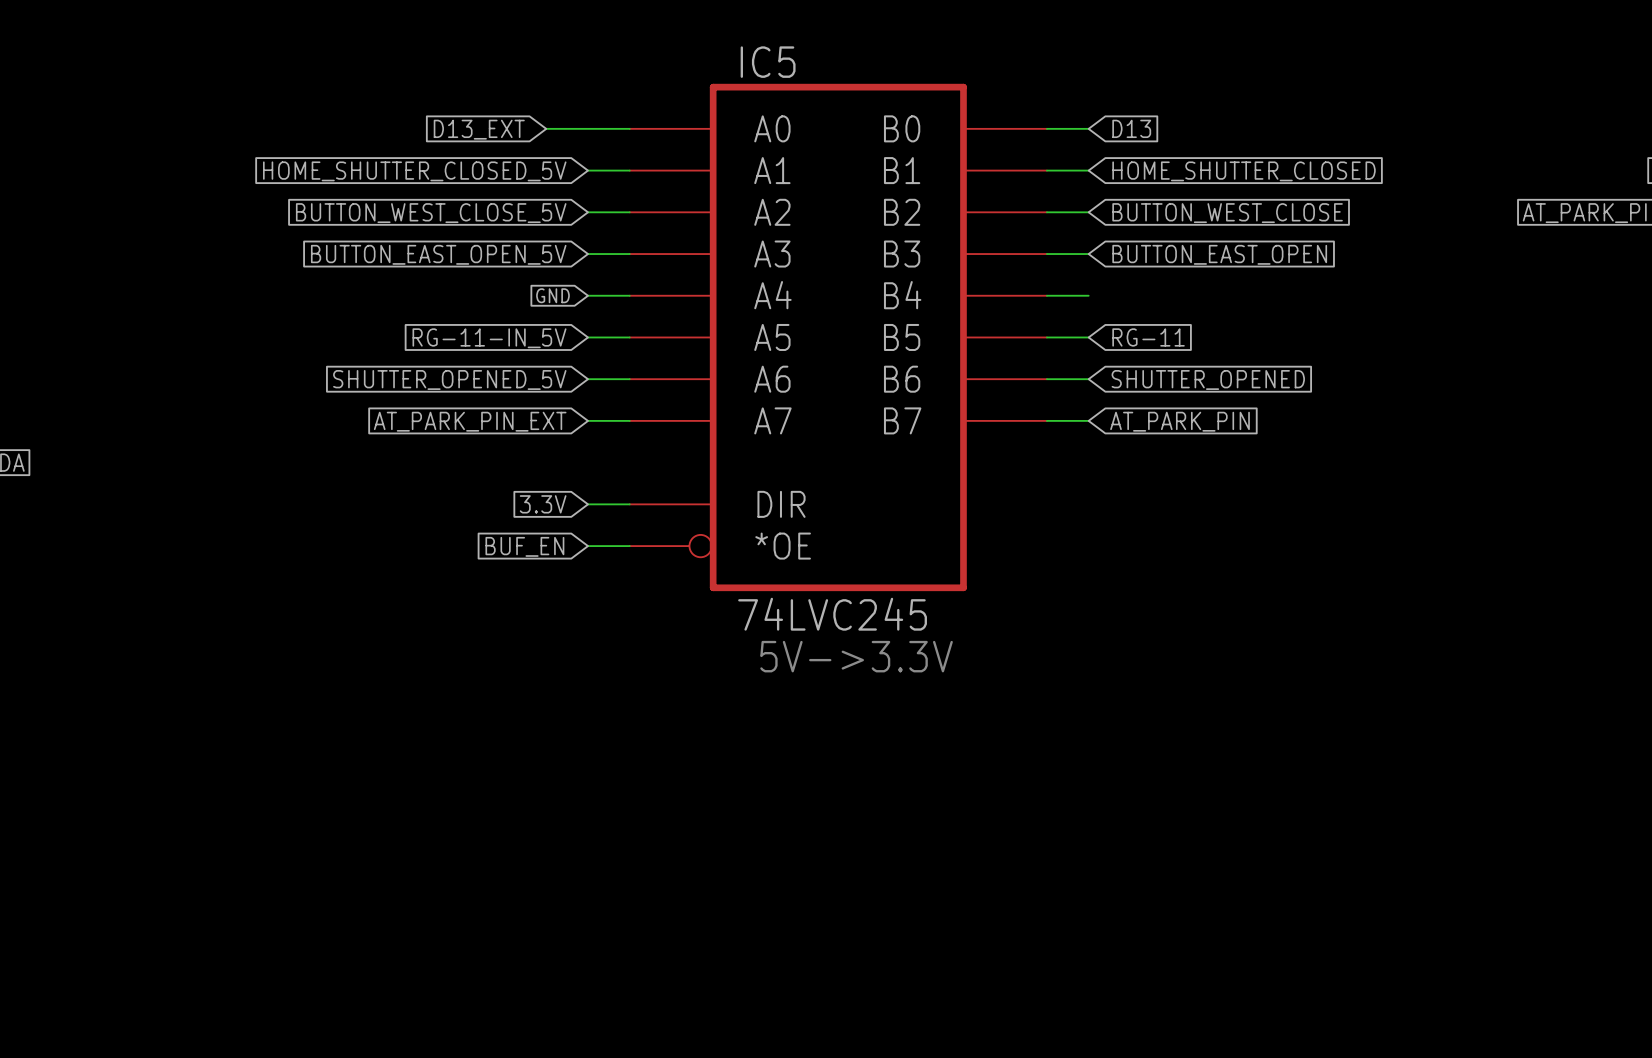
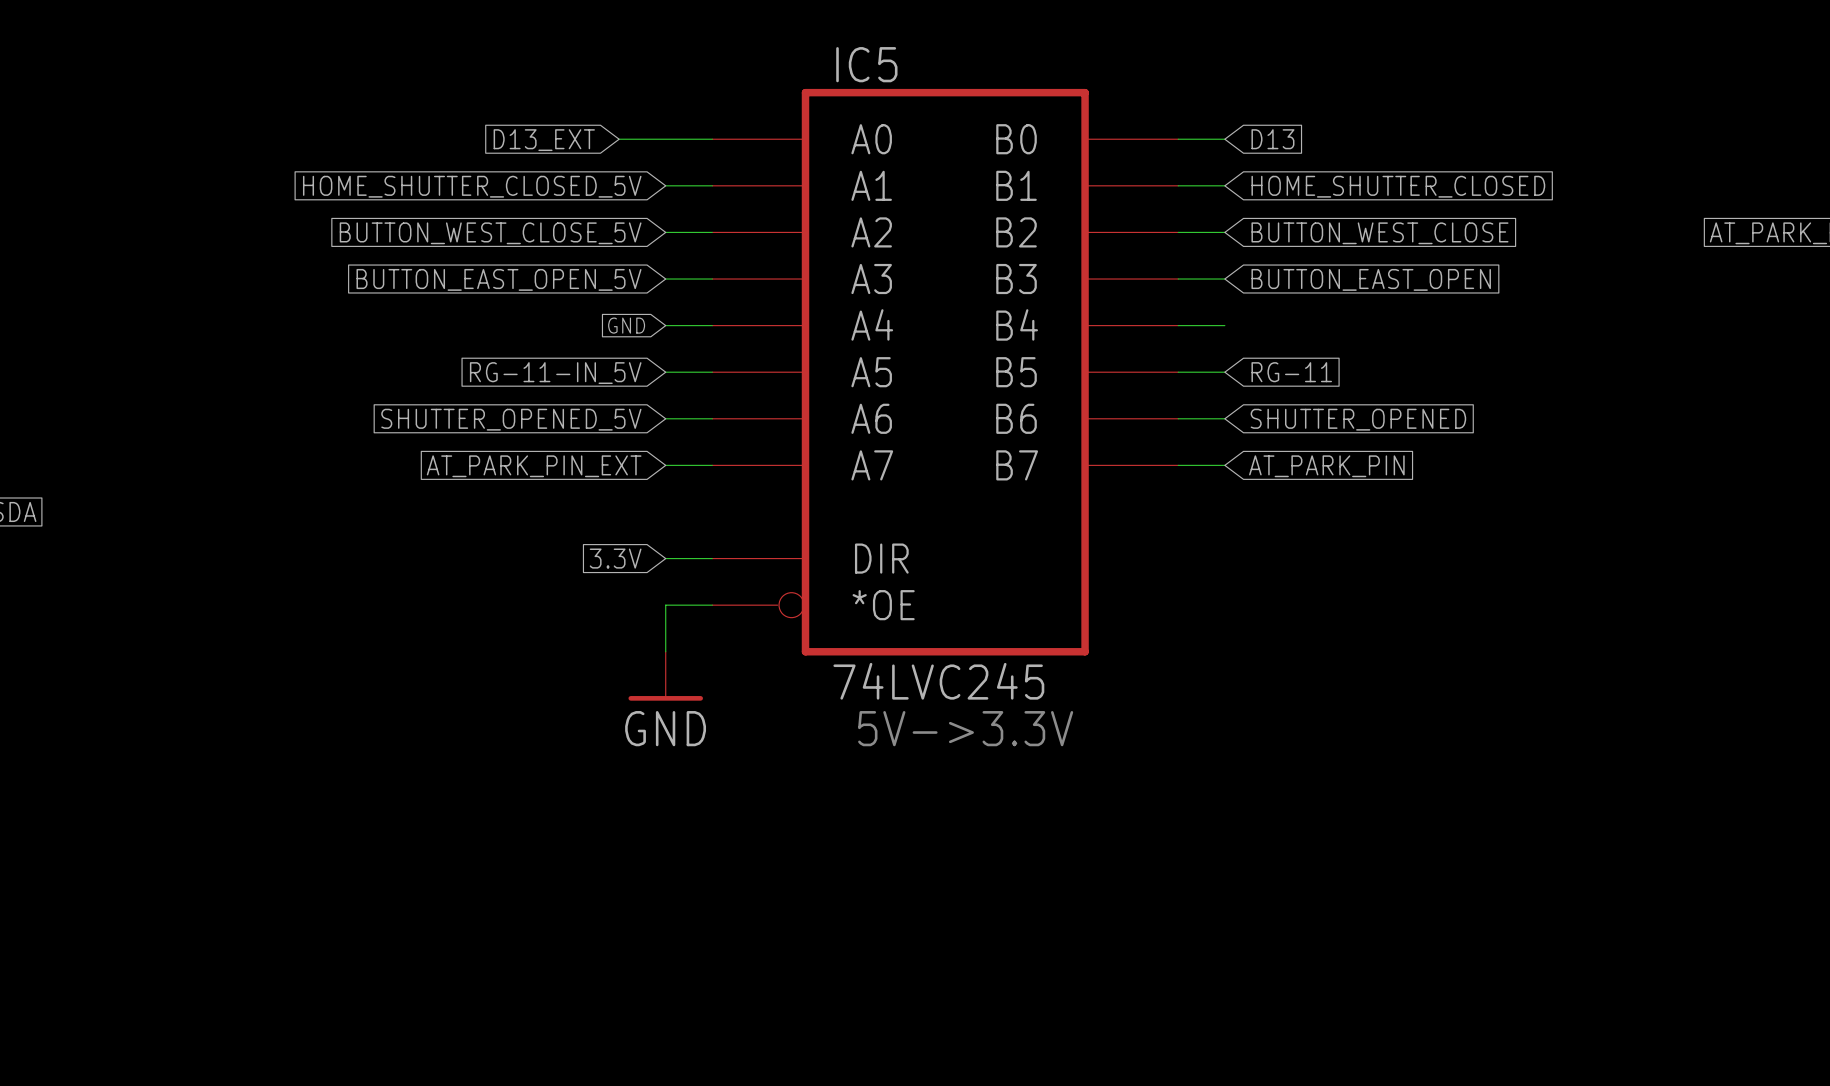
global label: BUF_EN (524, 546) -> none
wire: none -> (665, 605) (665, 651)
power symbol: none -> GND (665, 676)

